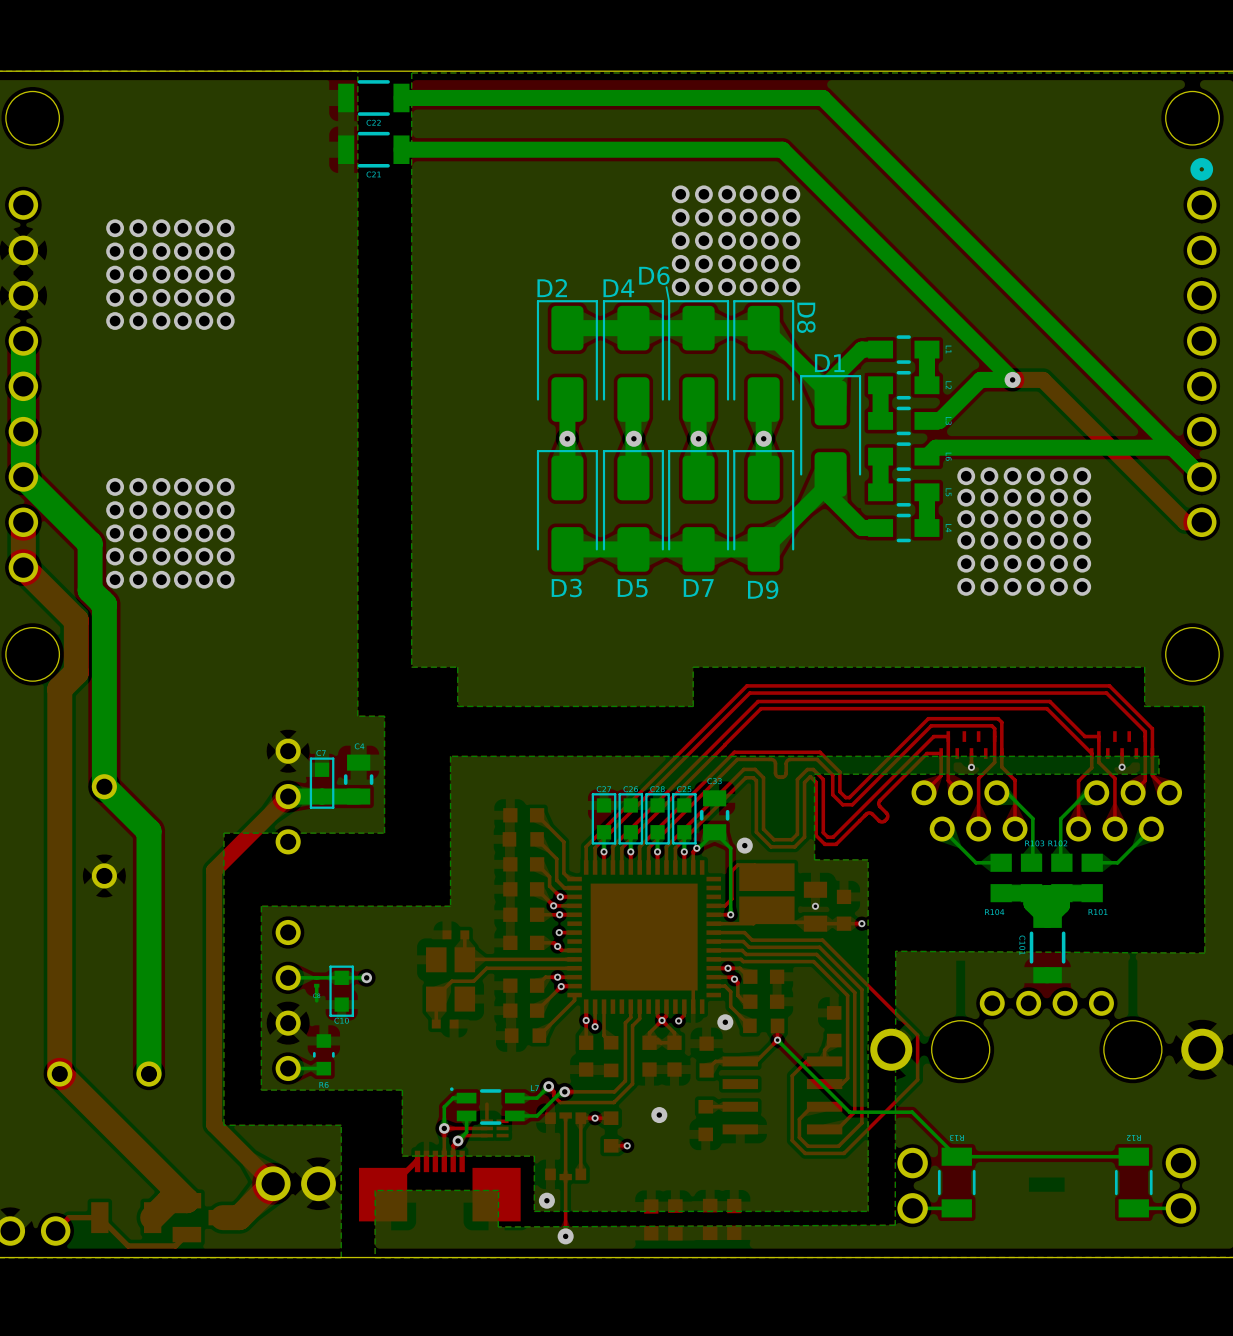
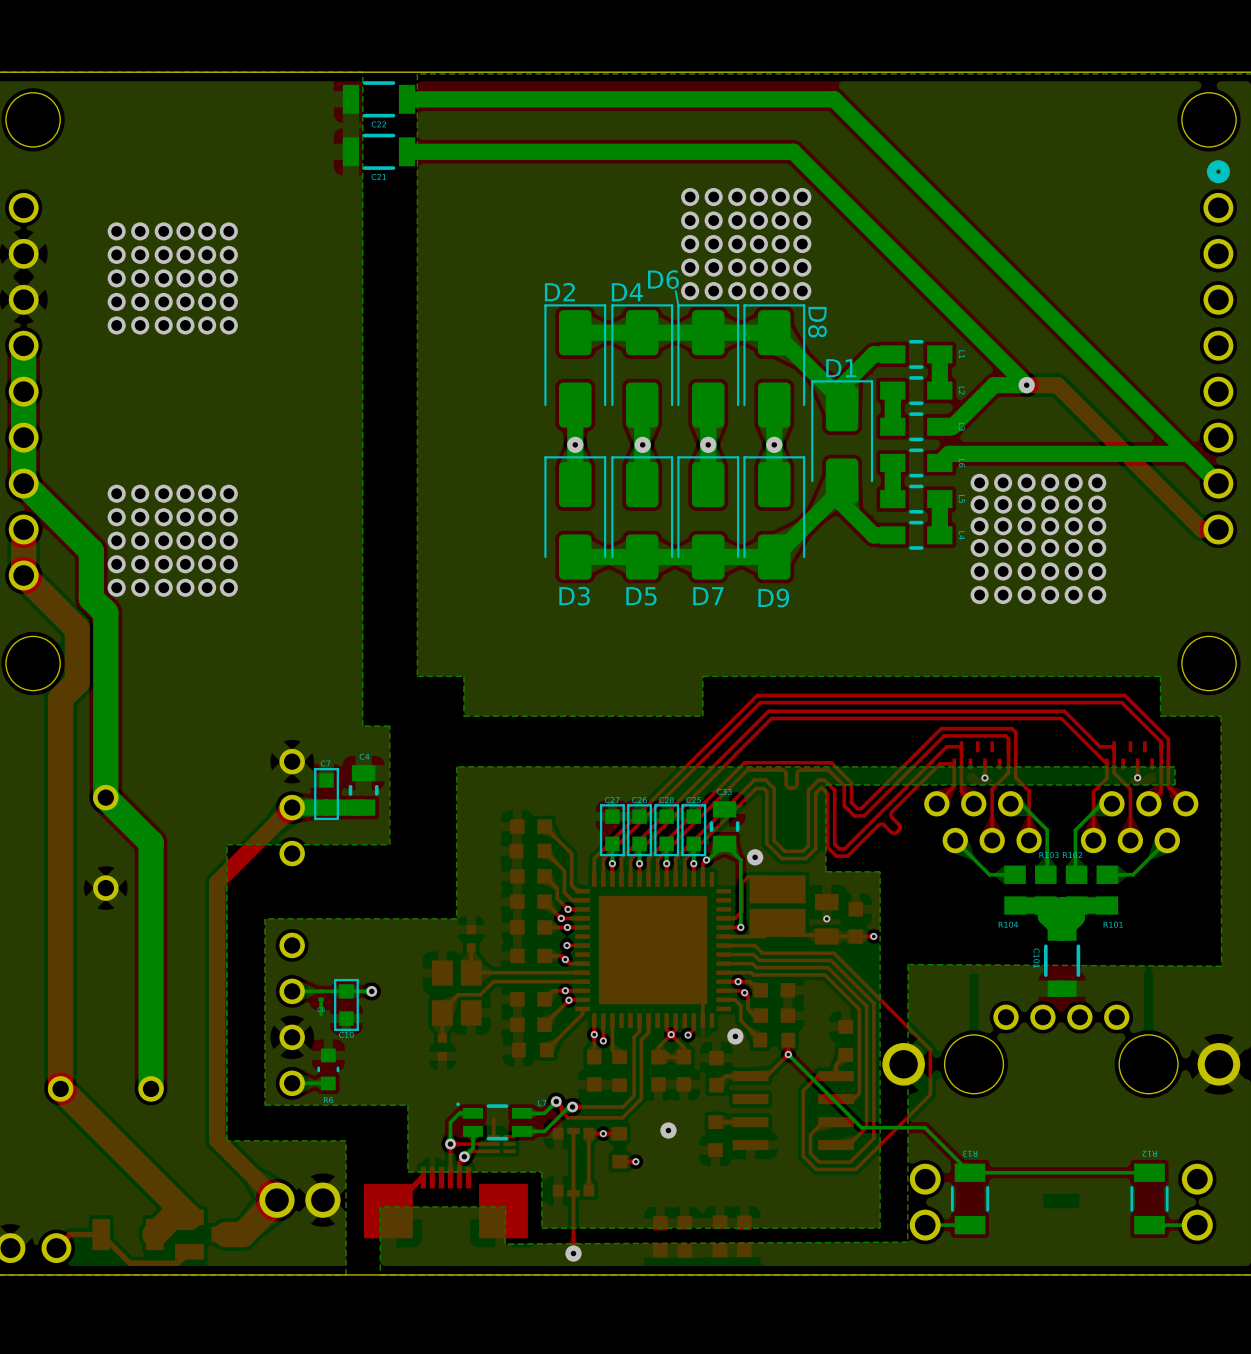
part rotation: 0° (455, 934) -> 90° clockwise (471, 938)
part rotation: 0° (445, 1024) -> 90° clockwise (442, 1047)
via: (546, 1200) -> none

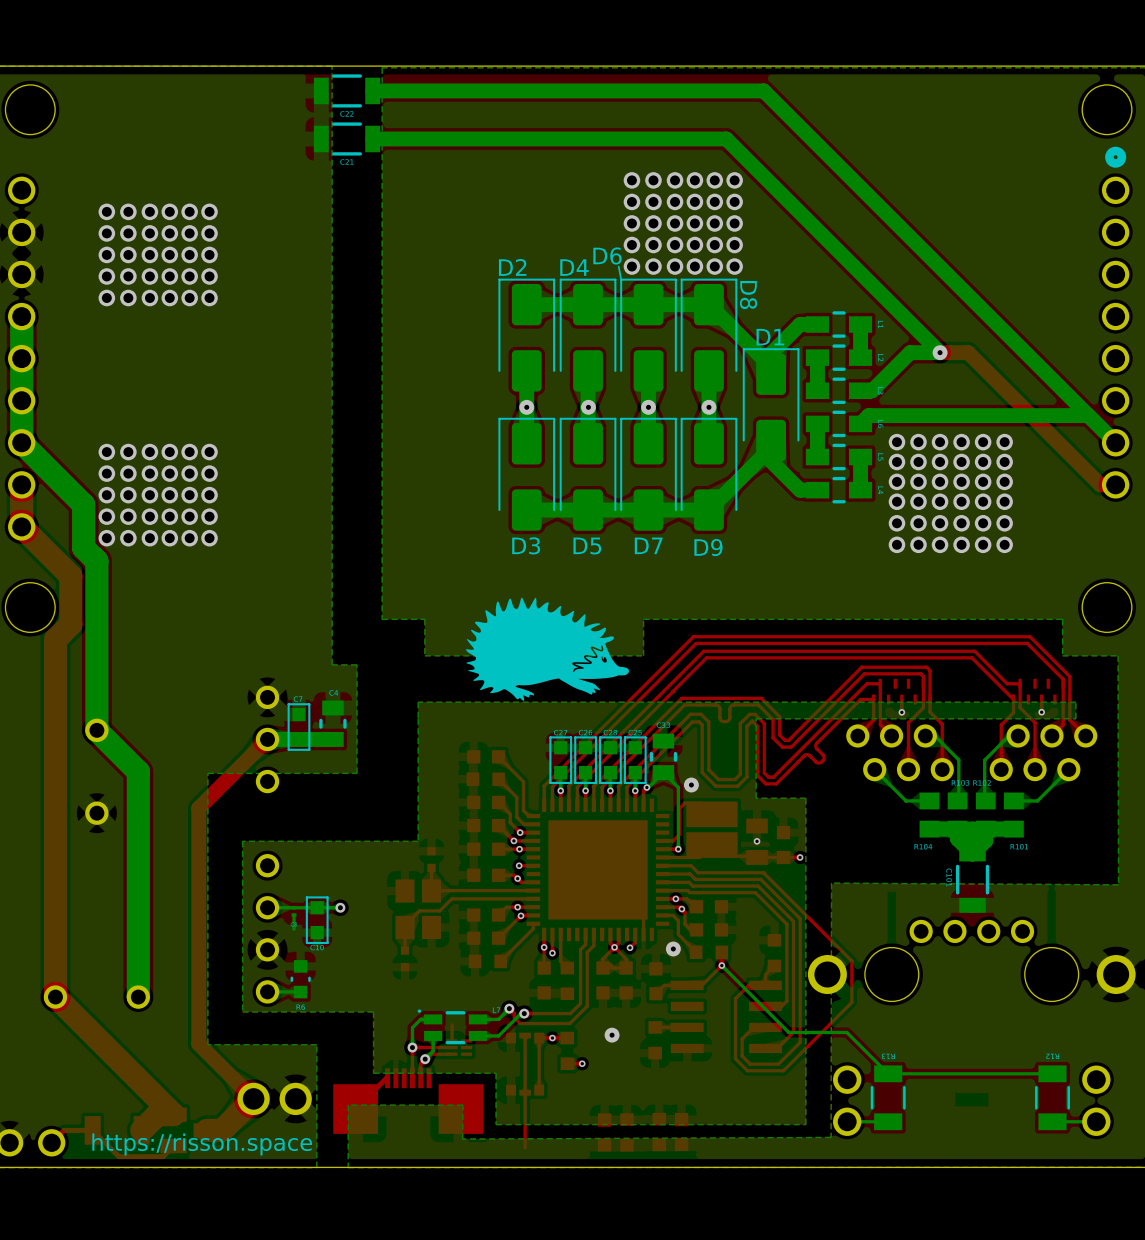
part: none -> (547, 649)
text: none -> https://risson.space (202, 1144)
via: (573, 1253) -> none

